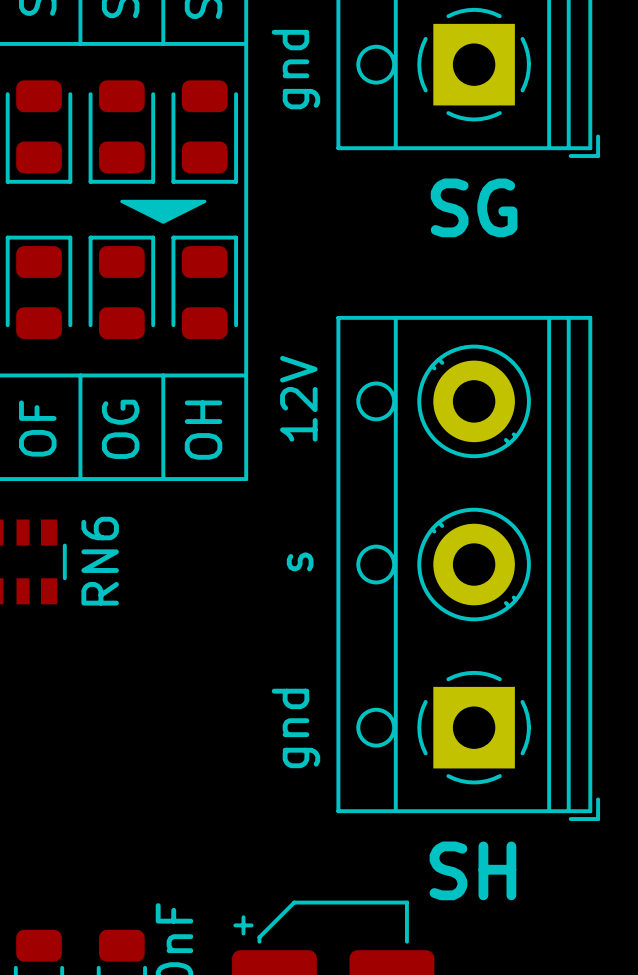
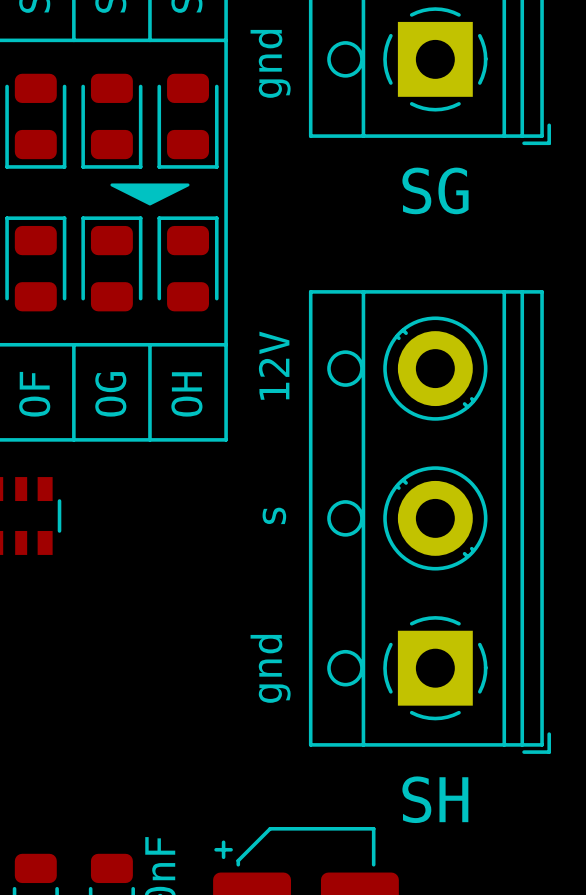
RN6 name: RN6 (100, 561) -> none

